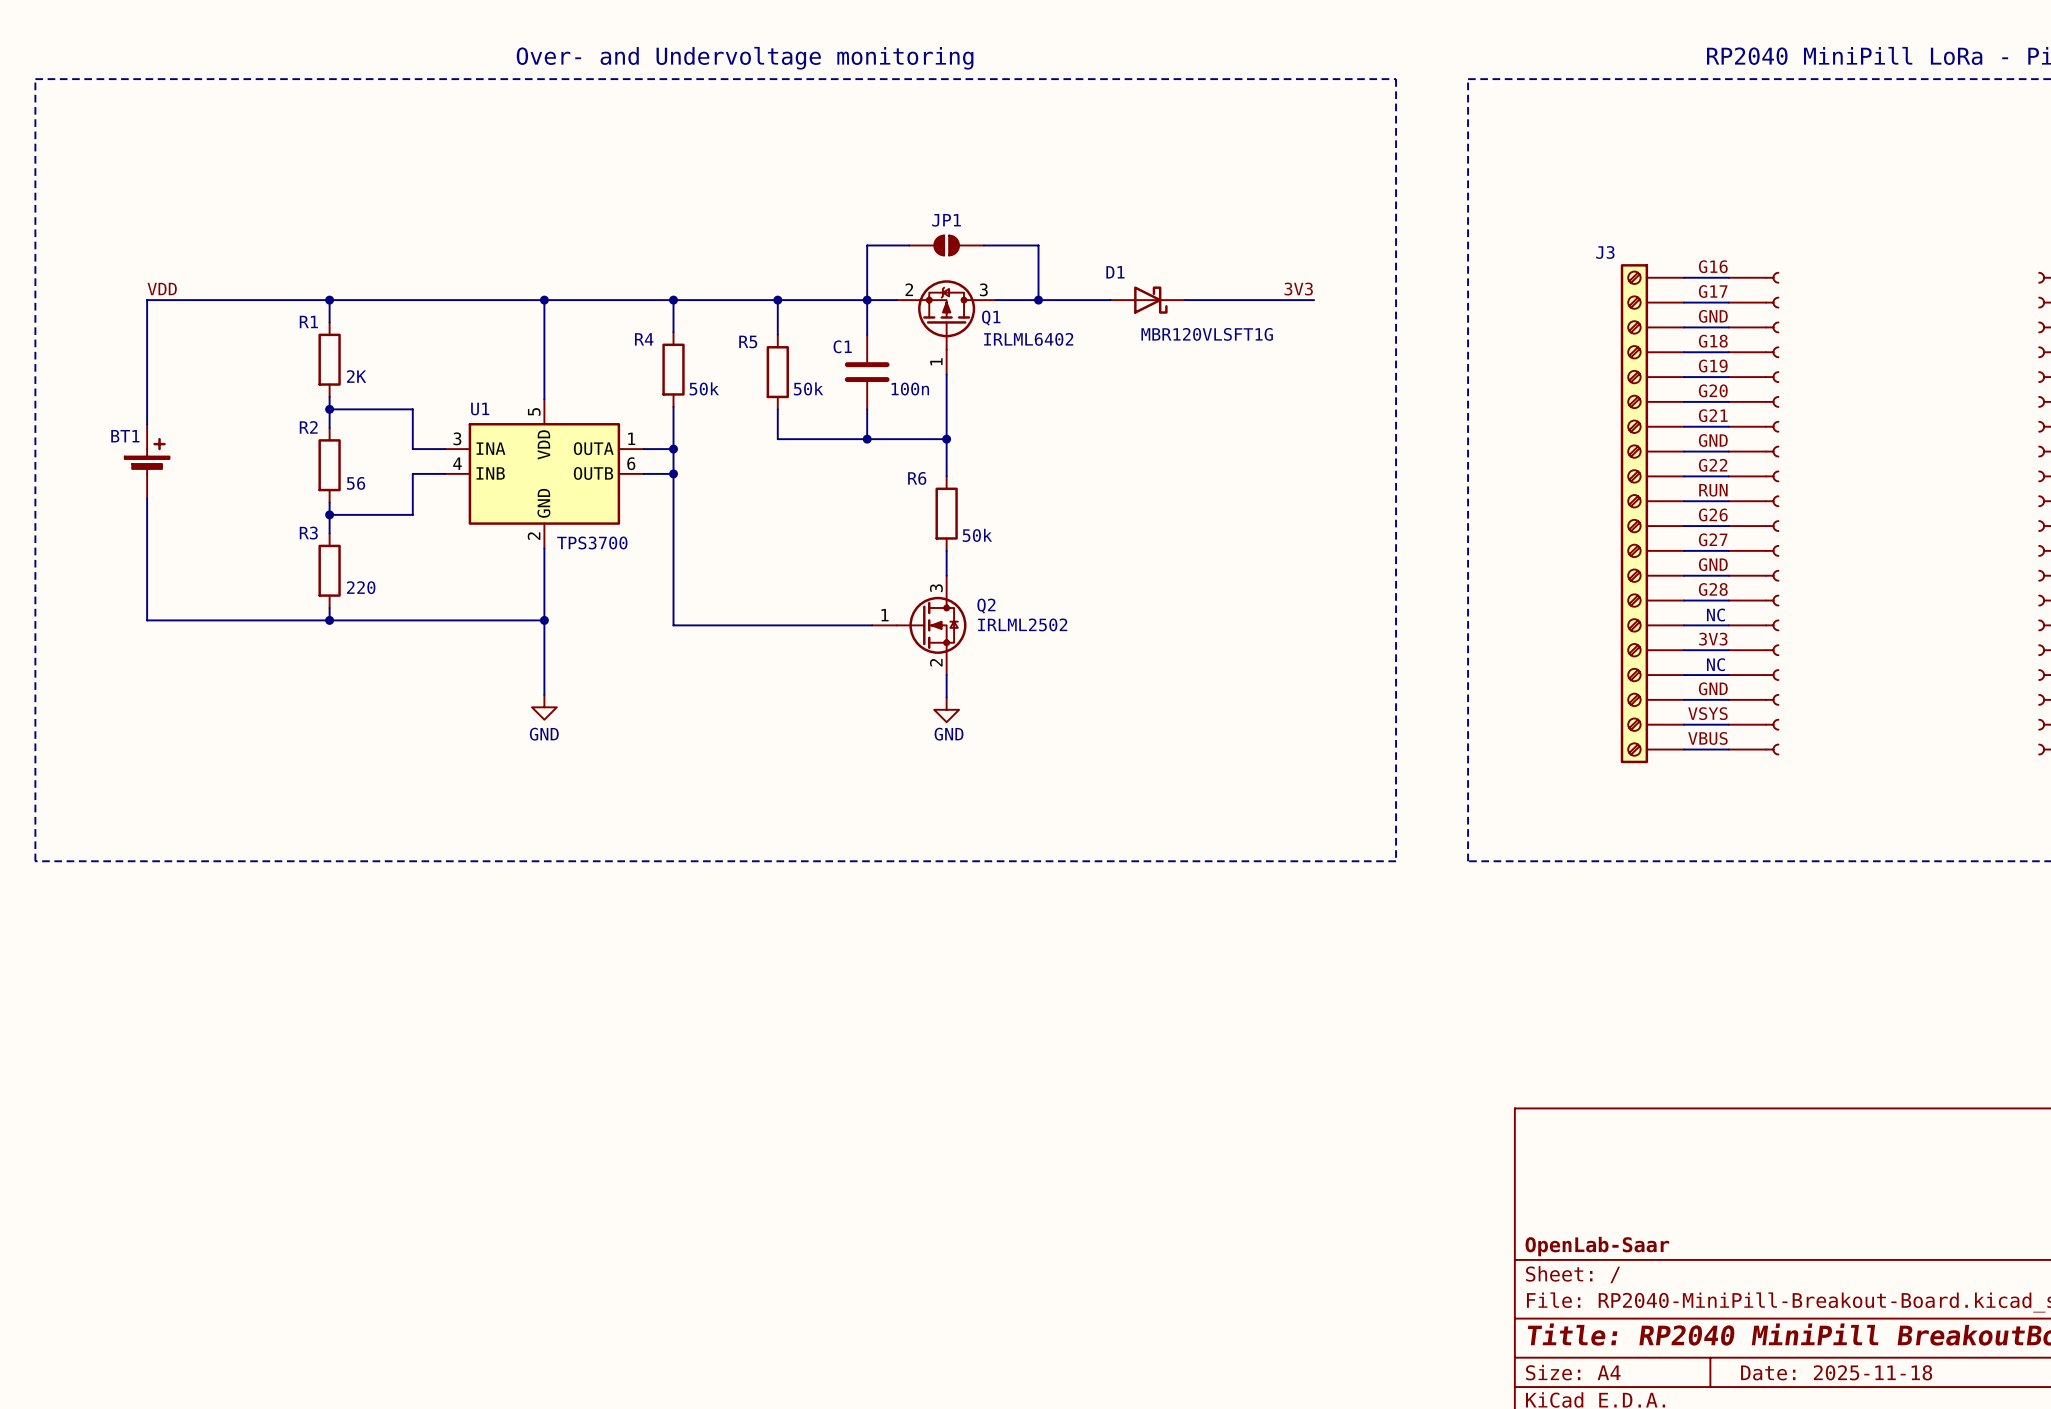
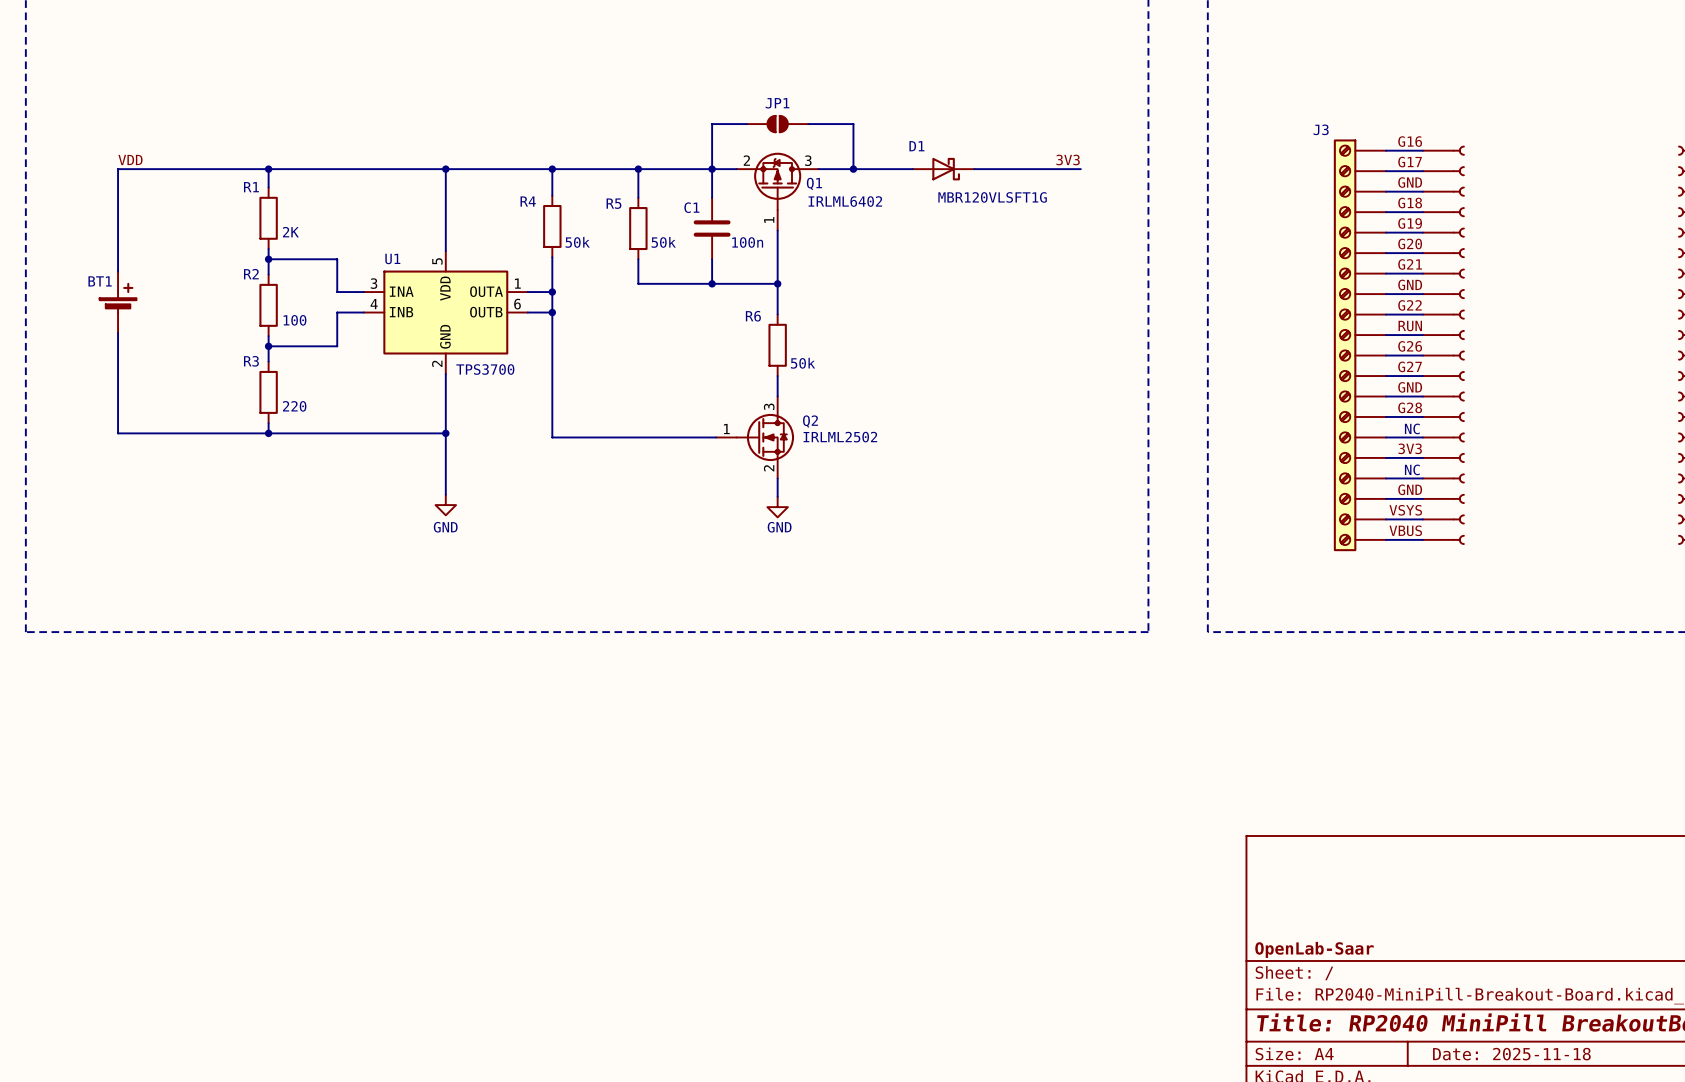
R2 value: 56 (356, 483) -> 100 (295, 320)

